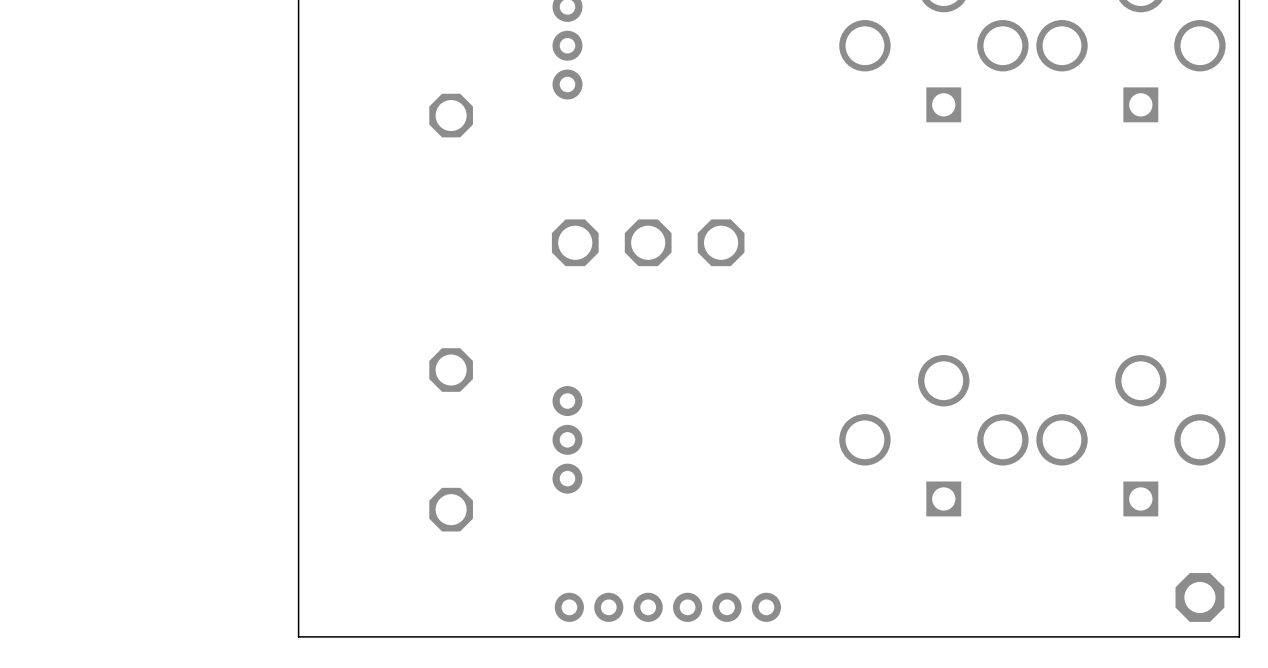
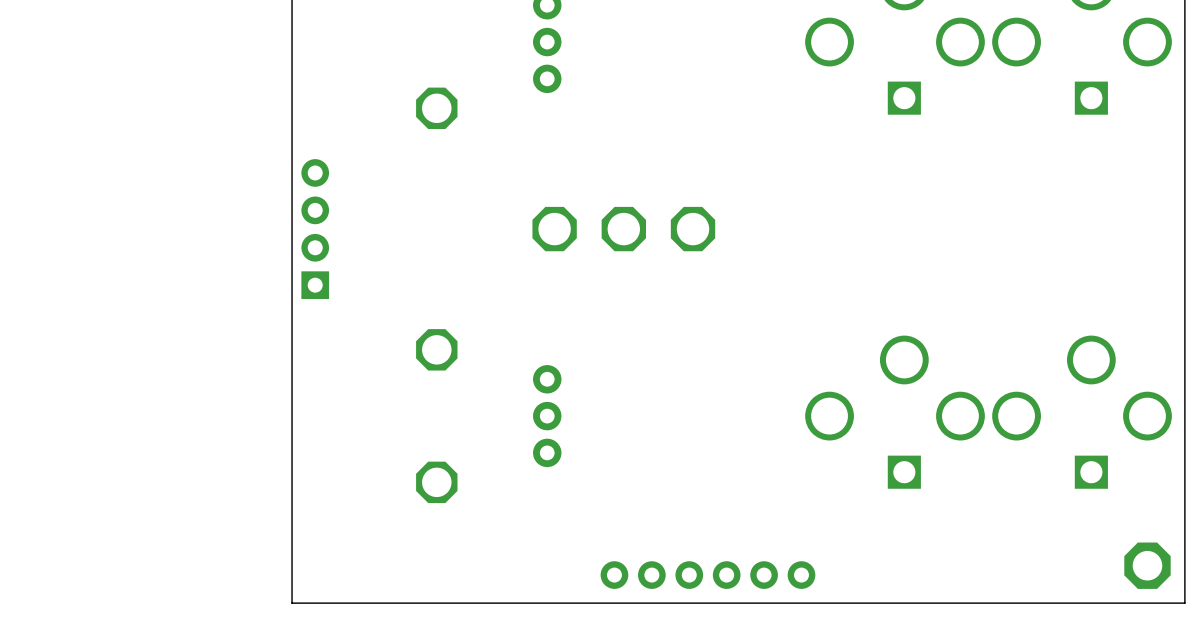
part: none -> (315, 229)
part position: (667, 607) -> (707, 575)

